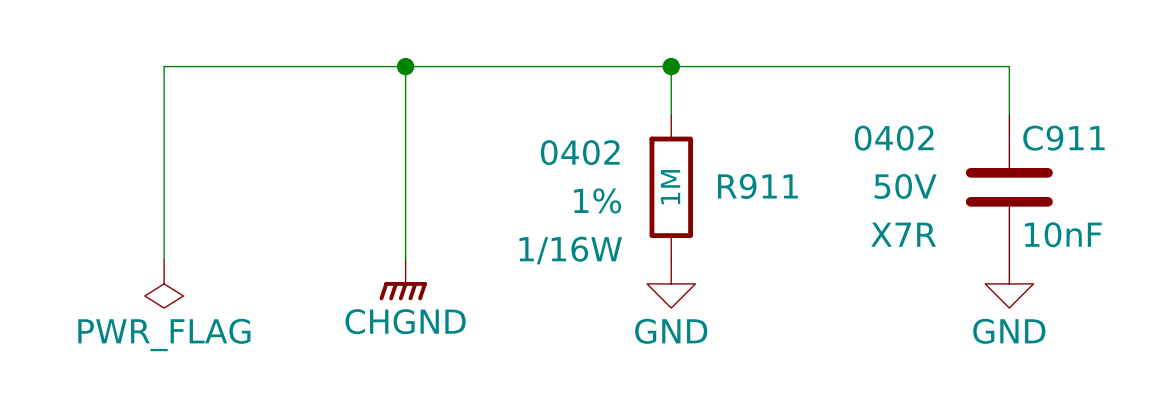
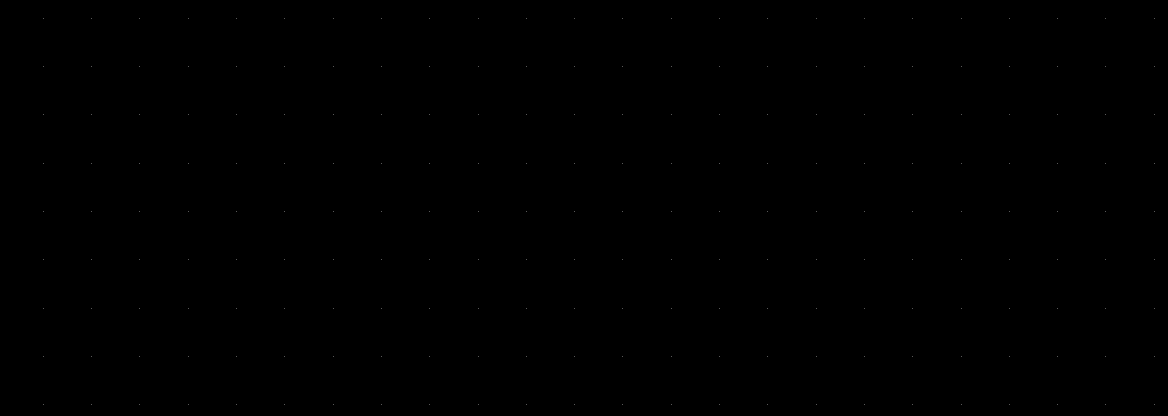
wire: (405, 66) (405, 259) -> none
junction: (405, 66) -> none
wire: (671, 66) (671, 114) -> none
junction: (671, 66) -> none
wire: (1009, 114) (1009, 66) (164, 66) (164, 259) -> none
R911: 1M (671, 187) -> none
C911: 10nF (1009, 187) -> none
power symbol: CHGND (403, 280) -> none
power symbol: PWR_FLAG (164, 283) -> none
power symbol: GND (671, 283) -> none
power symbol: GND (1009, 283) -> none

